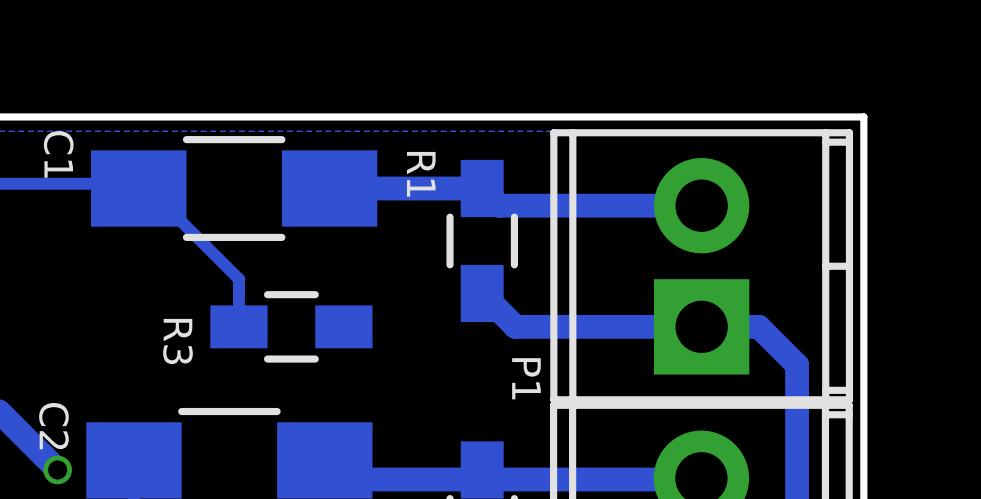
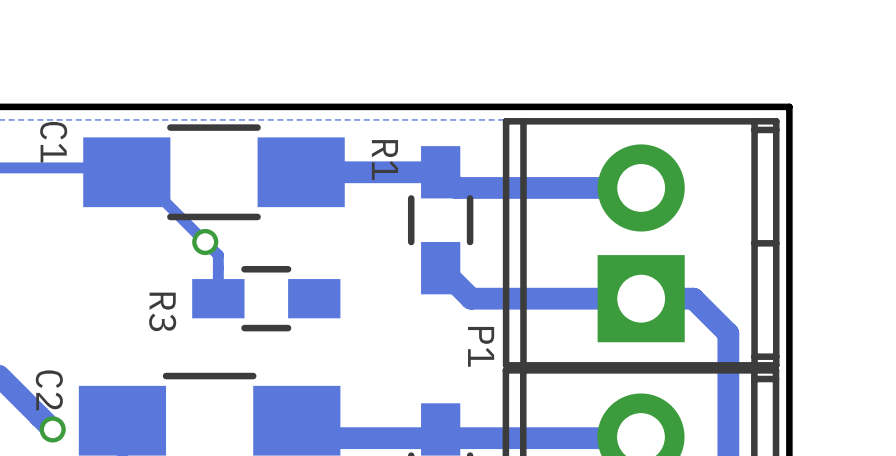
via: none -> (205, 242)

